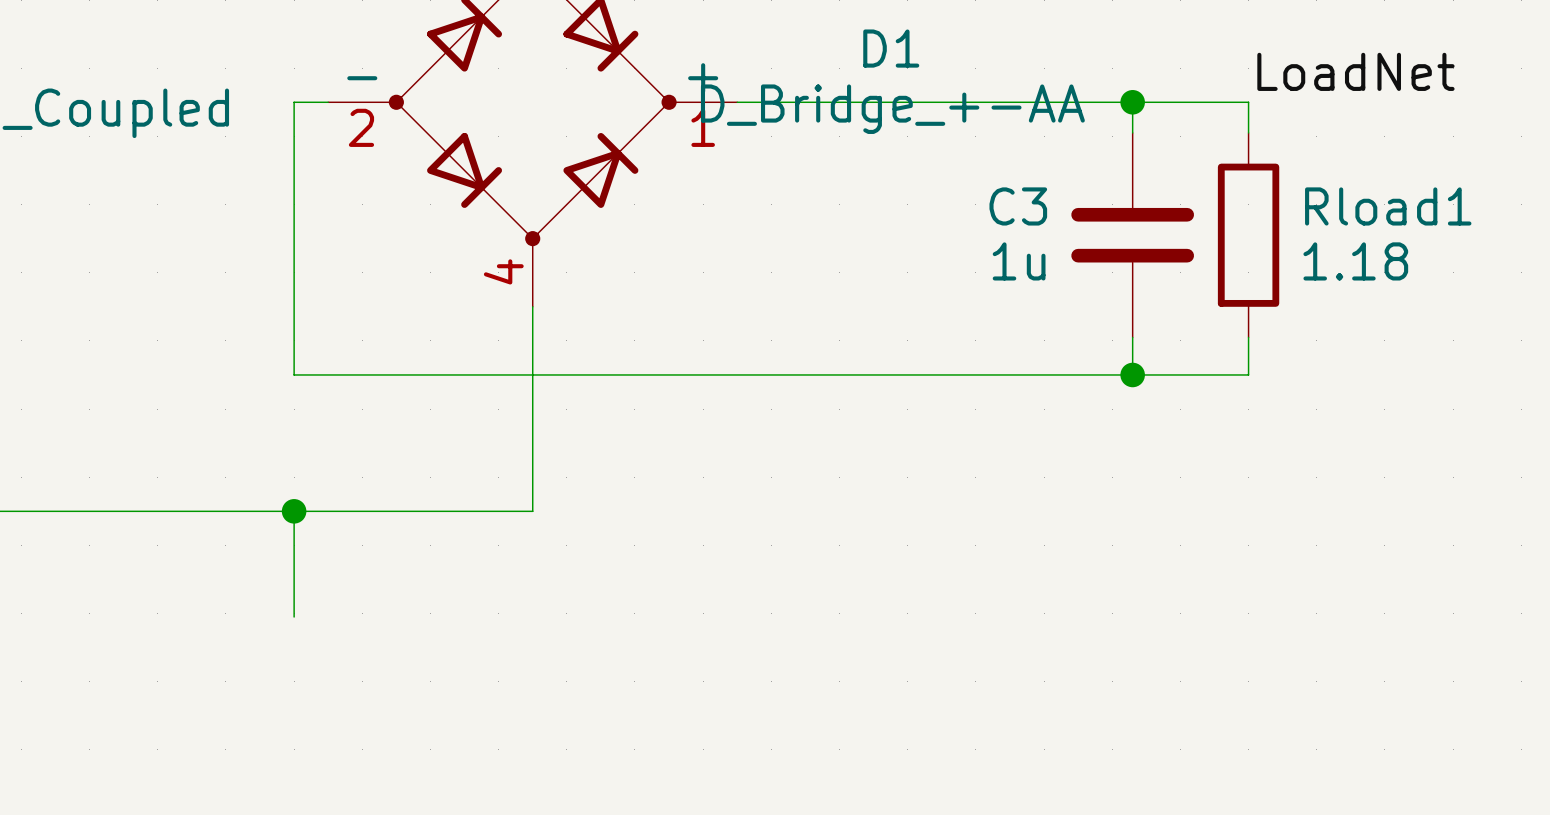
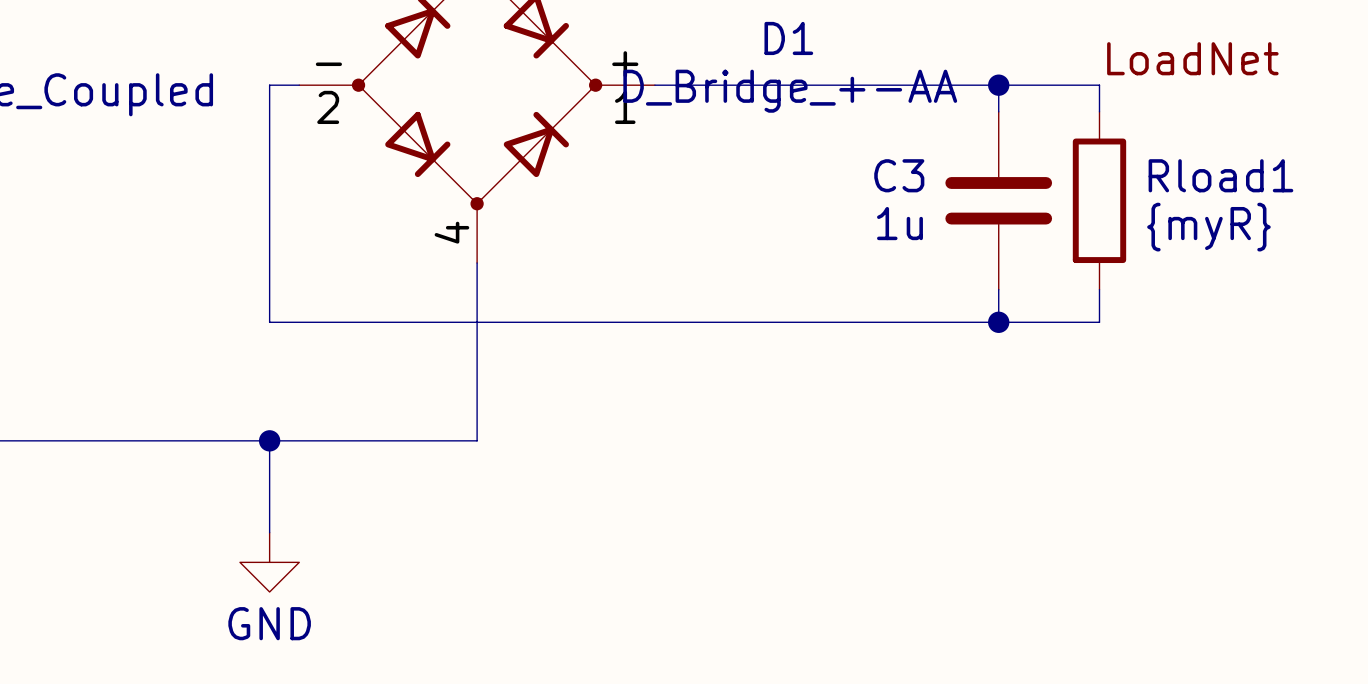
Rload1 value: 1.18 (1355, 261) -> {myR} (1208, 227)
power symbol: none -> GND (269, 562)

